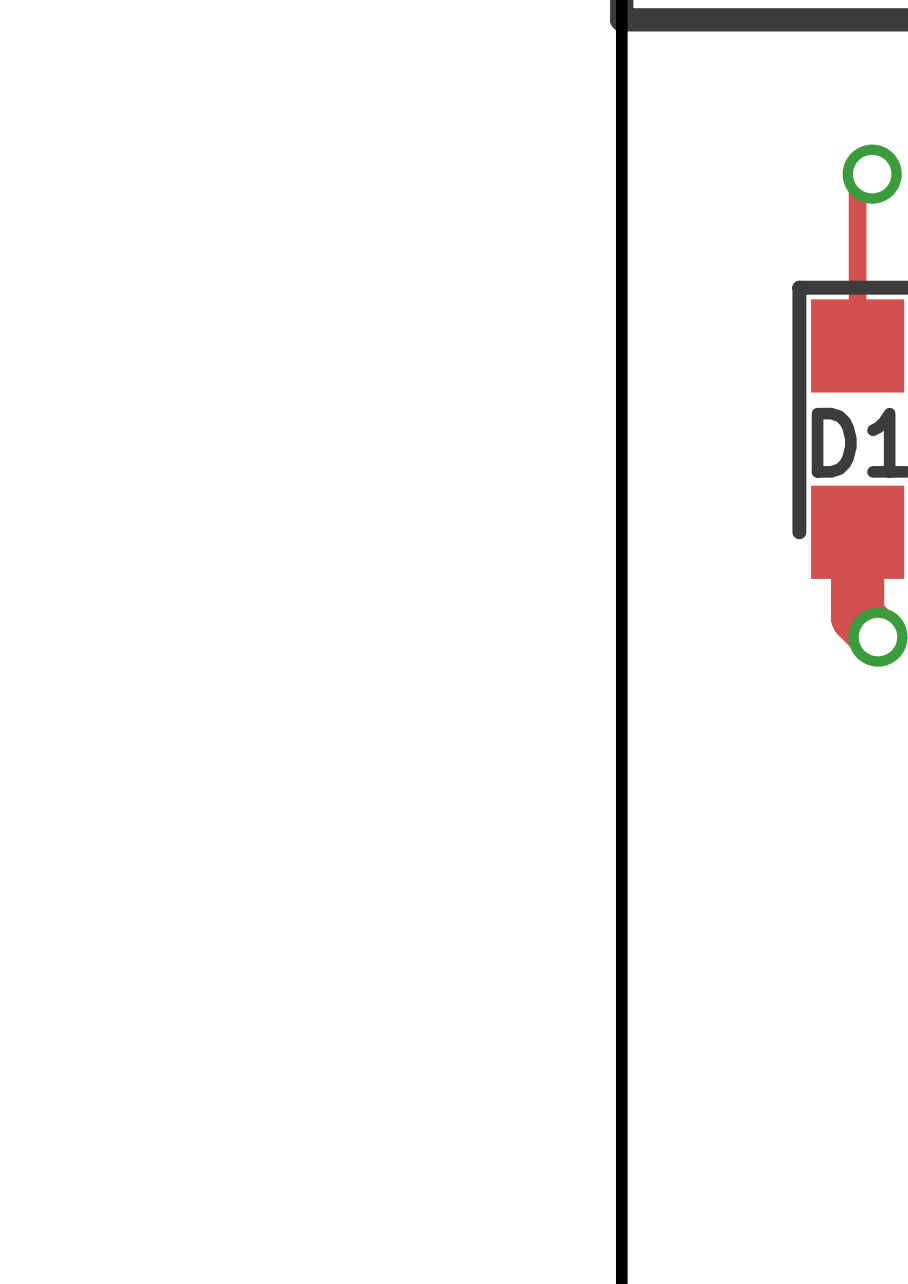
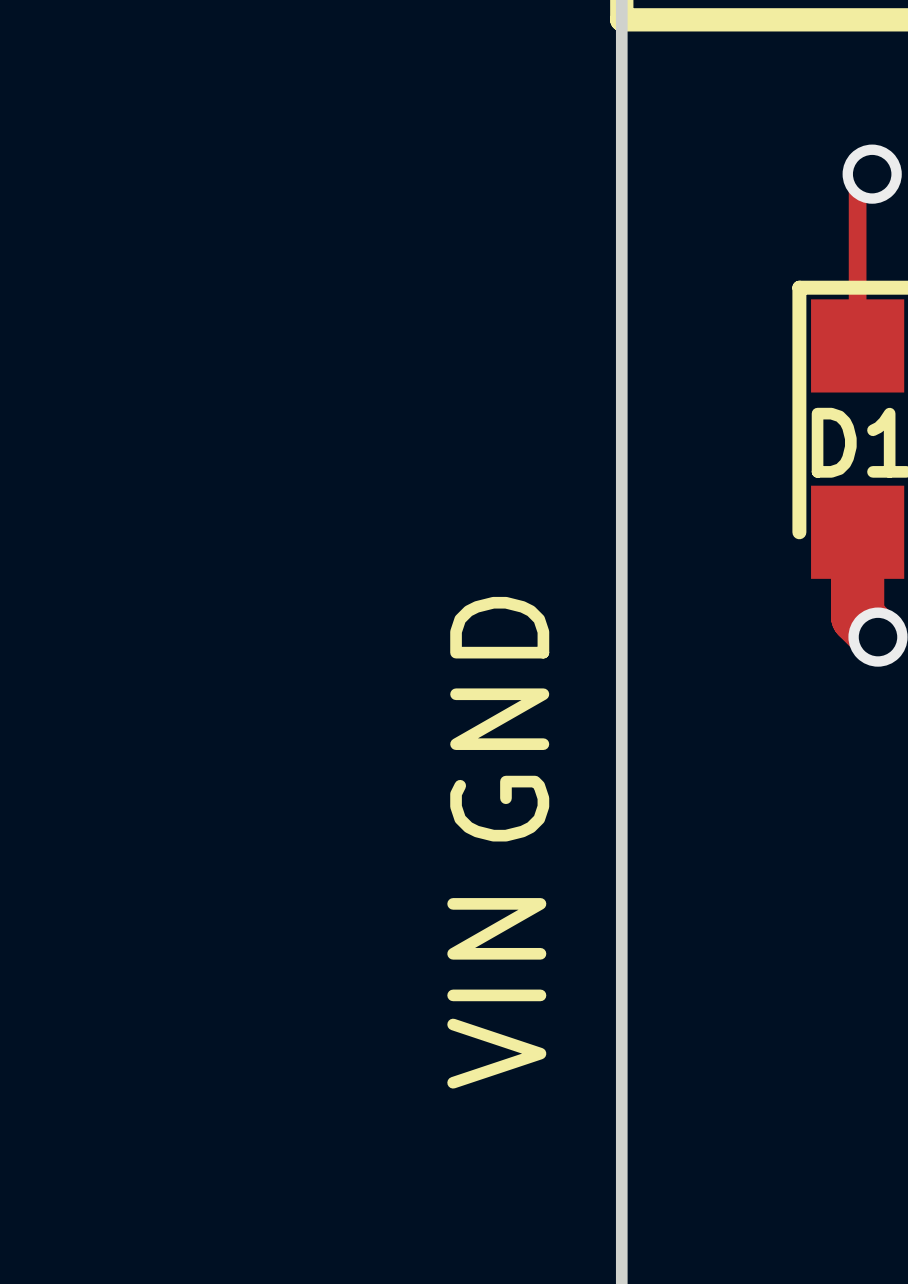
text: none -> GND (499, 719)
text: none -> VIN (496, 993)

